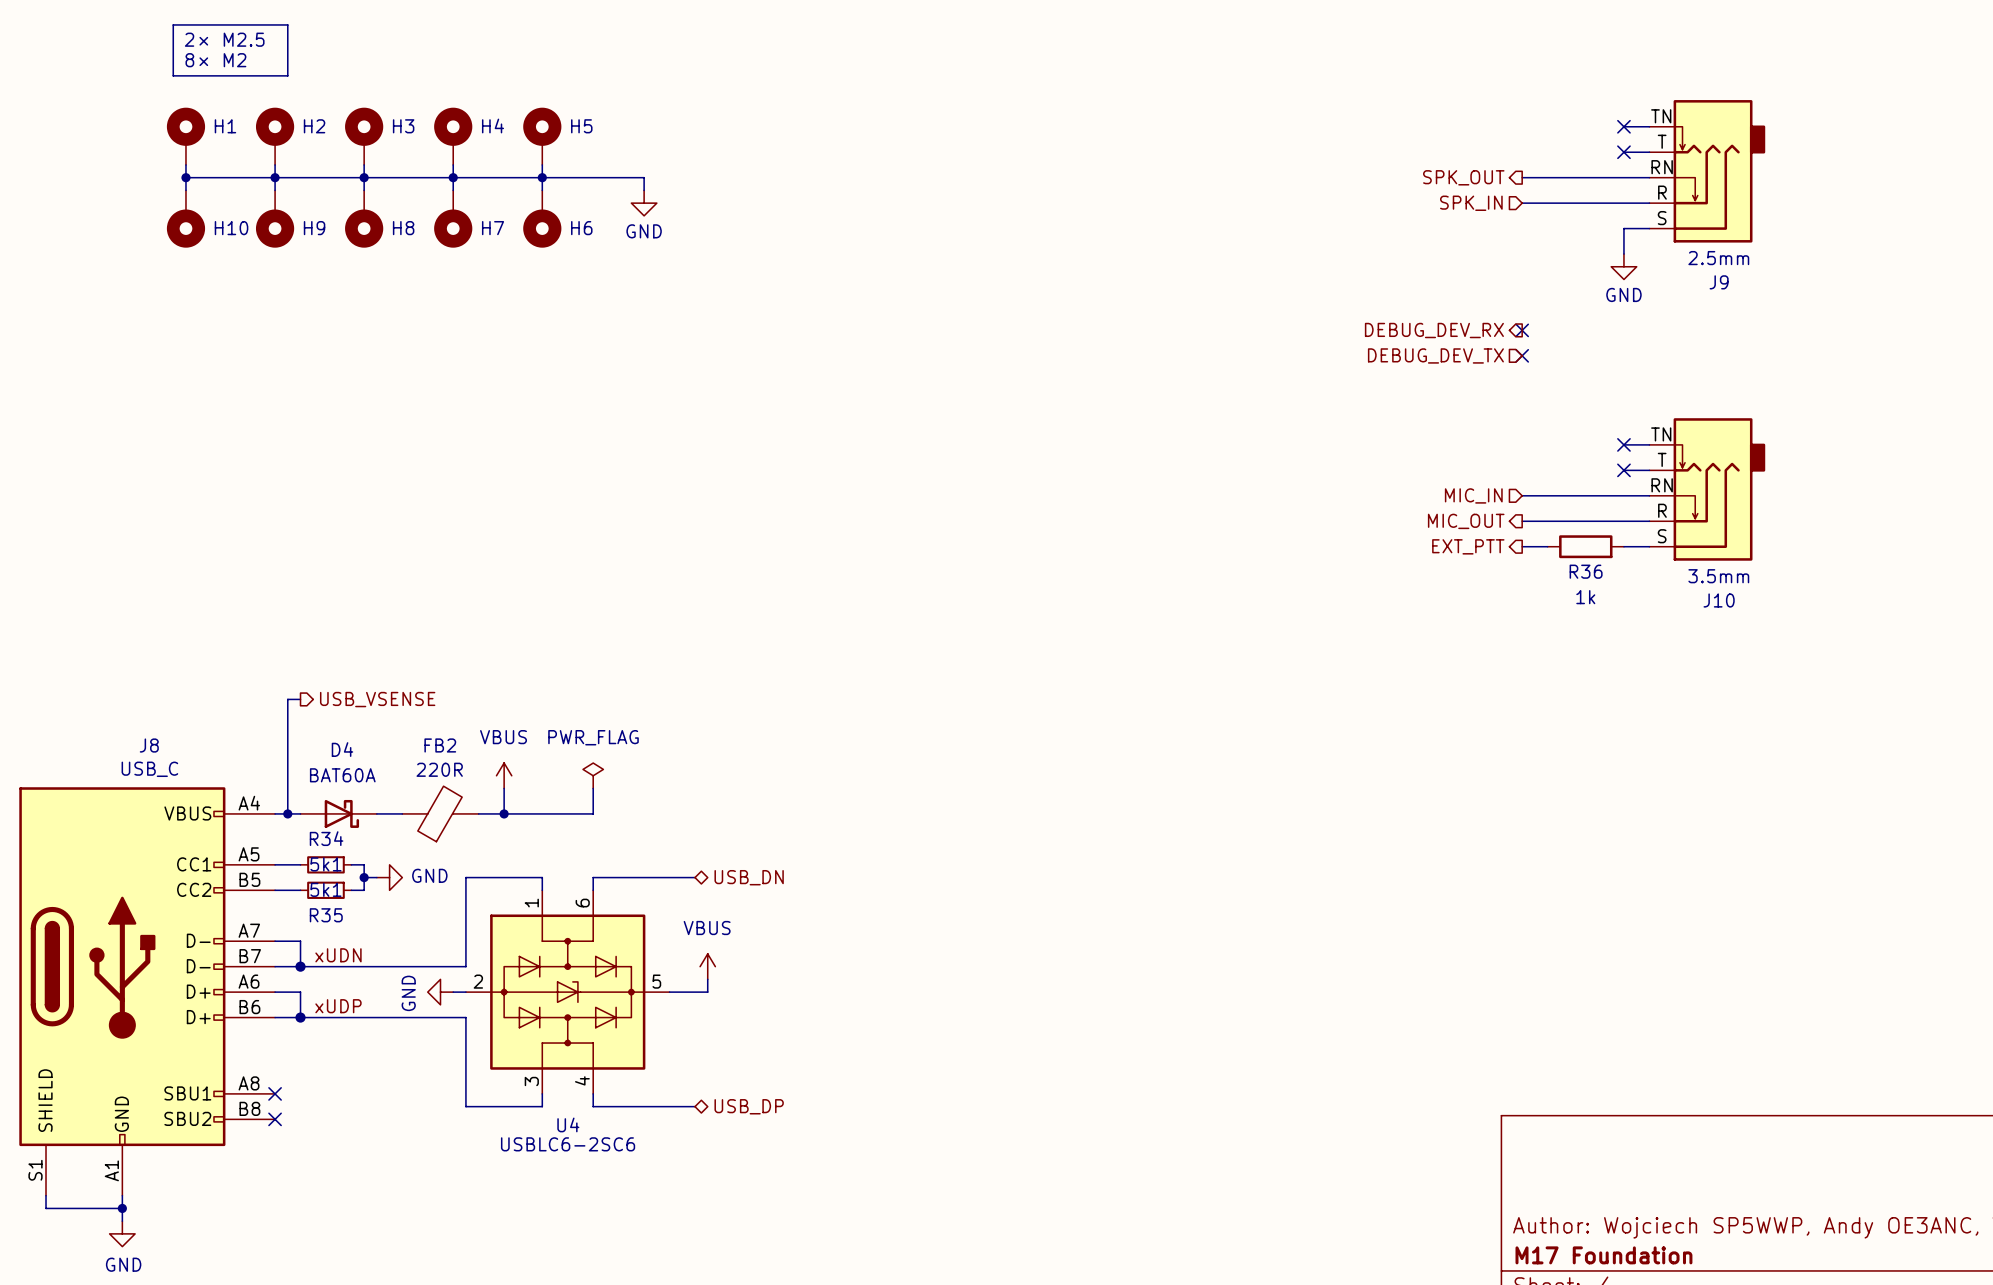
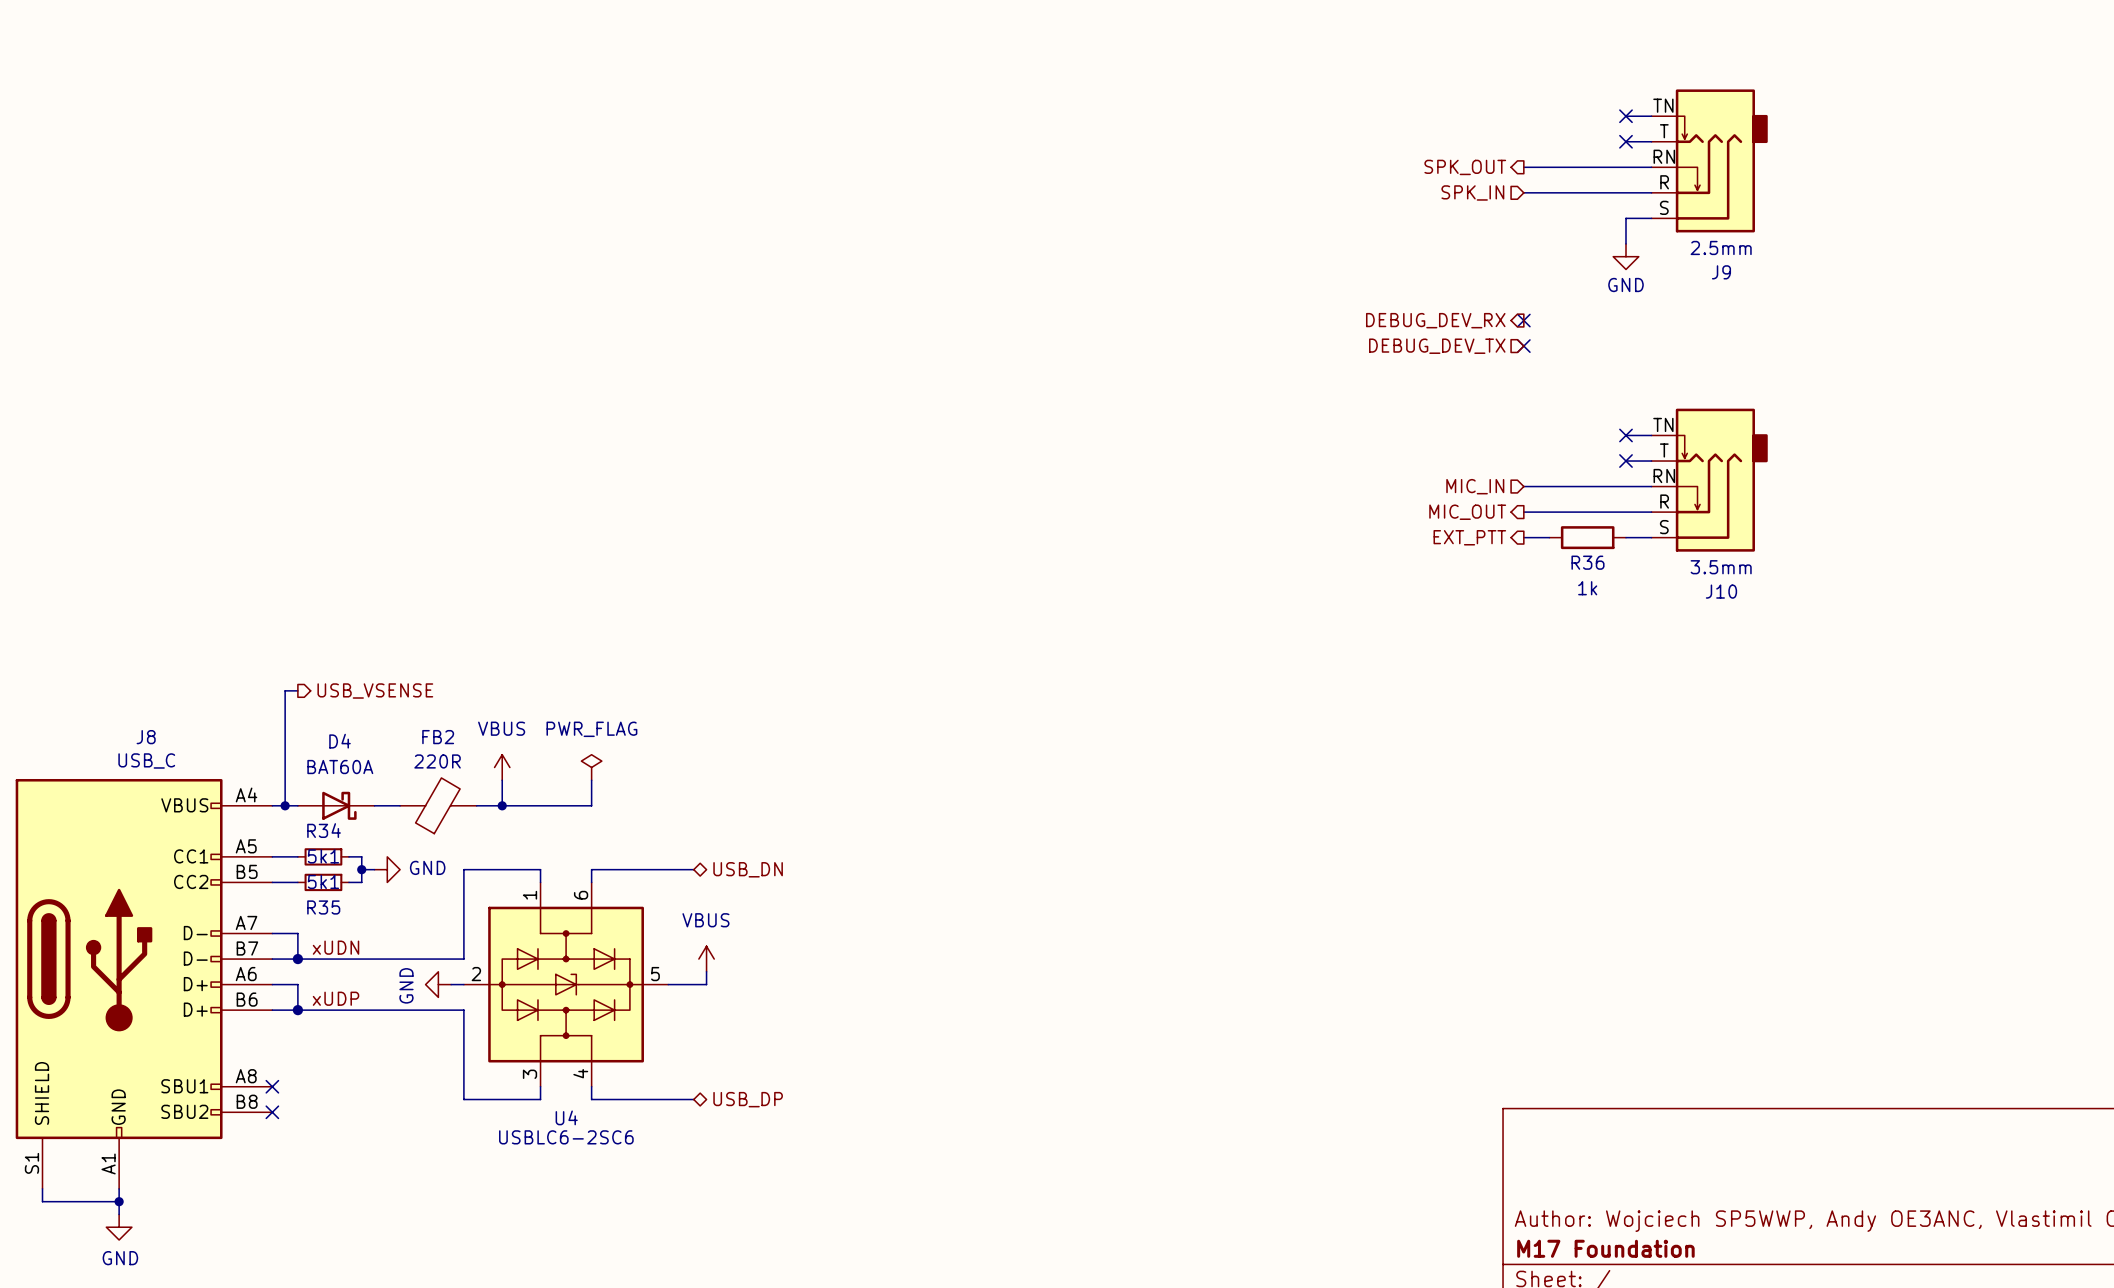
line: (173, 24) (287, 24) (287, 75) (173, 75) (173, 24) -> none
text: 2× M2.5 (224, 39) -> none
text: 8× M2 (215, 60) -> none
H1: (185, 136) -> none
H2: (275, 136) -> none
H3: (364, 136) -> none
H4: (453, 136) -> none
H5: (542, 136) -> none
wire: (185, 164) (185, 190) -> none
wire: (275, 164) (275, 190) -> none
wire: (364, 164) (364, 190) -> none
wire: (453, 164) (453, 190) -> none
wire: (542, 164) (542, 190) -> none
wire: (185, 177) (644, 177) (644, 190) -> none
junction: (185, 177) -> none
junction: (275, 177) -> none
junction: (364, 177) -> none
junction: (453, 177) -> none
junction: (542, 177) -> none
power symbol: GND (644, 203) -> none
H10: (185, 219) -> none
H9: (275, 219) -> none
H8: (364, 219) -> none
H7: (453, 219) -> none
H6: (542, 219) -> none

